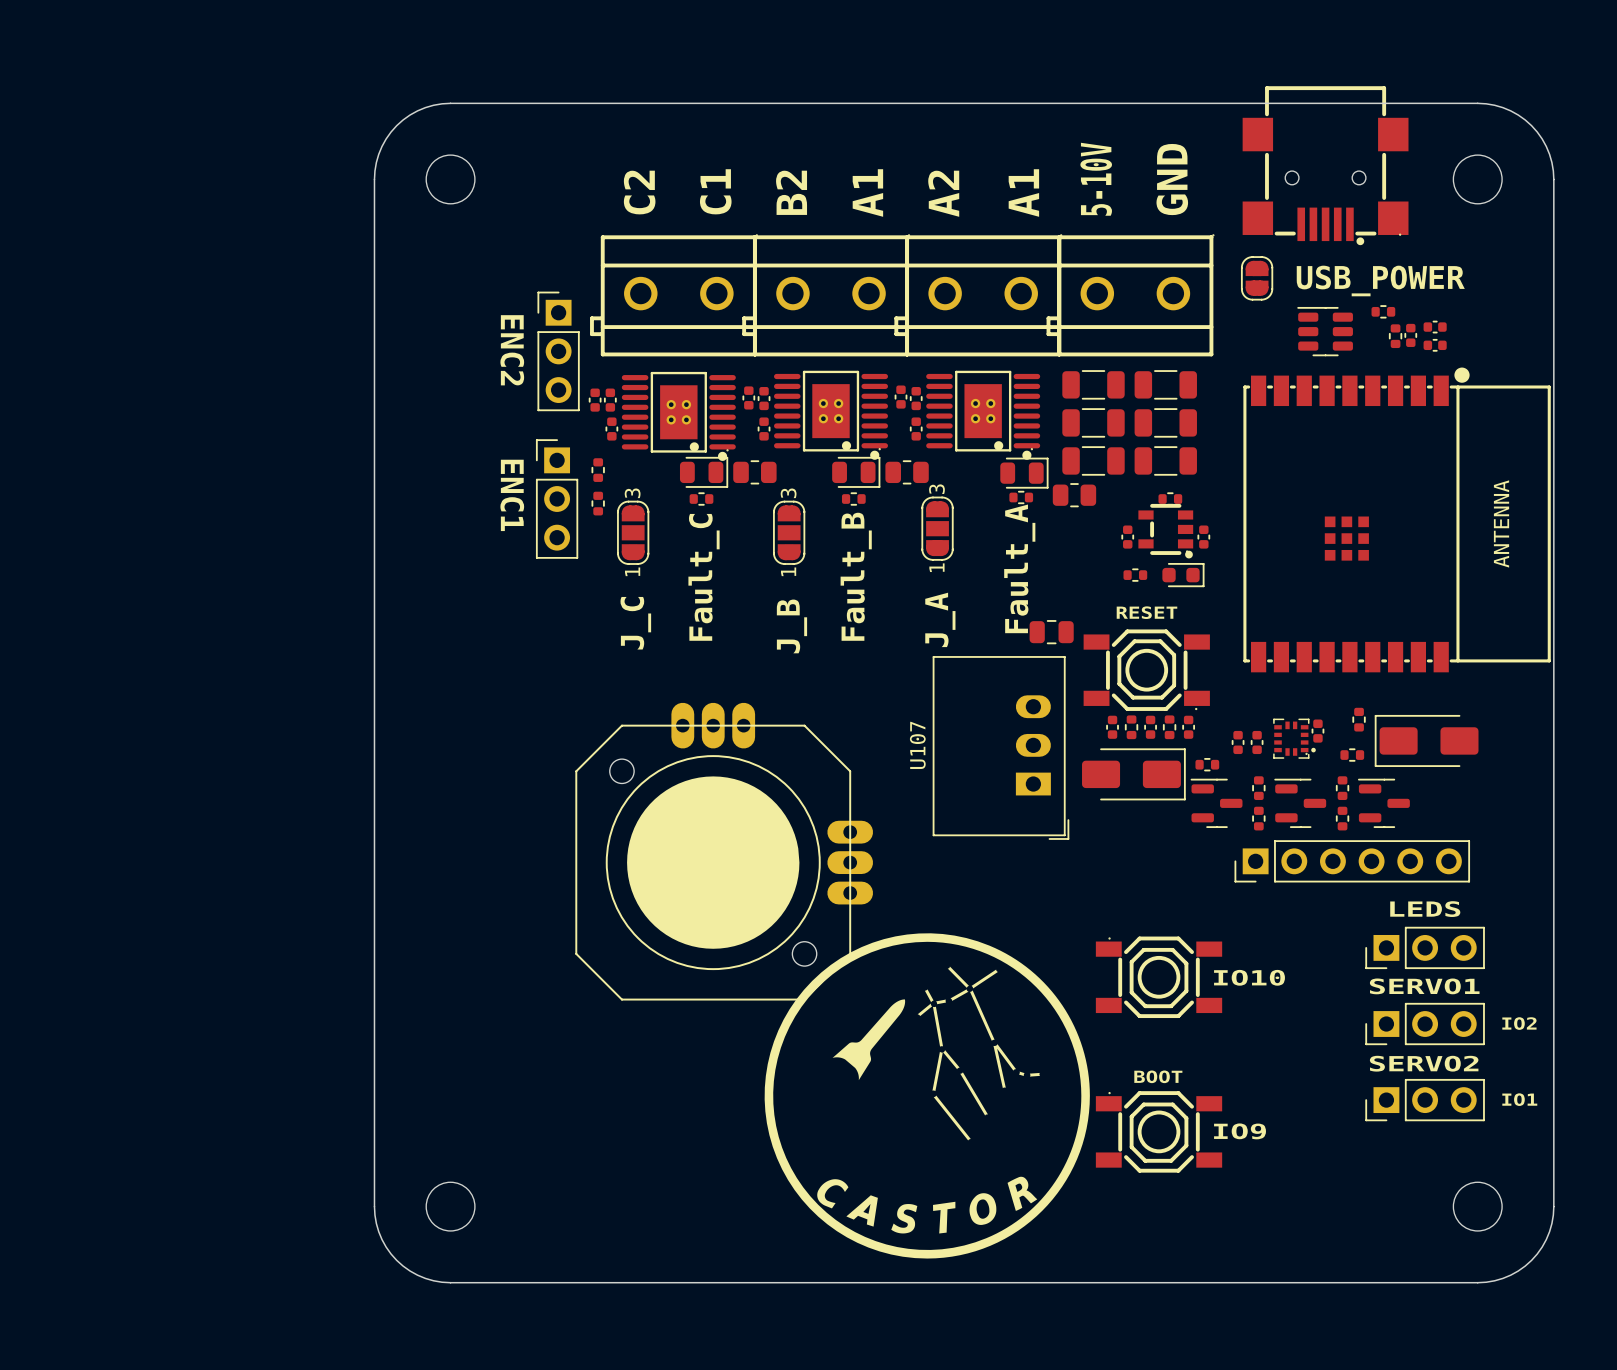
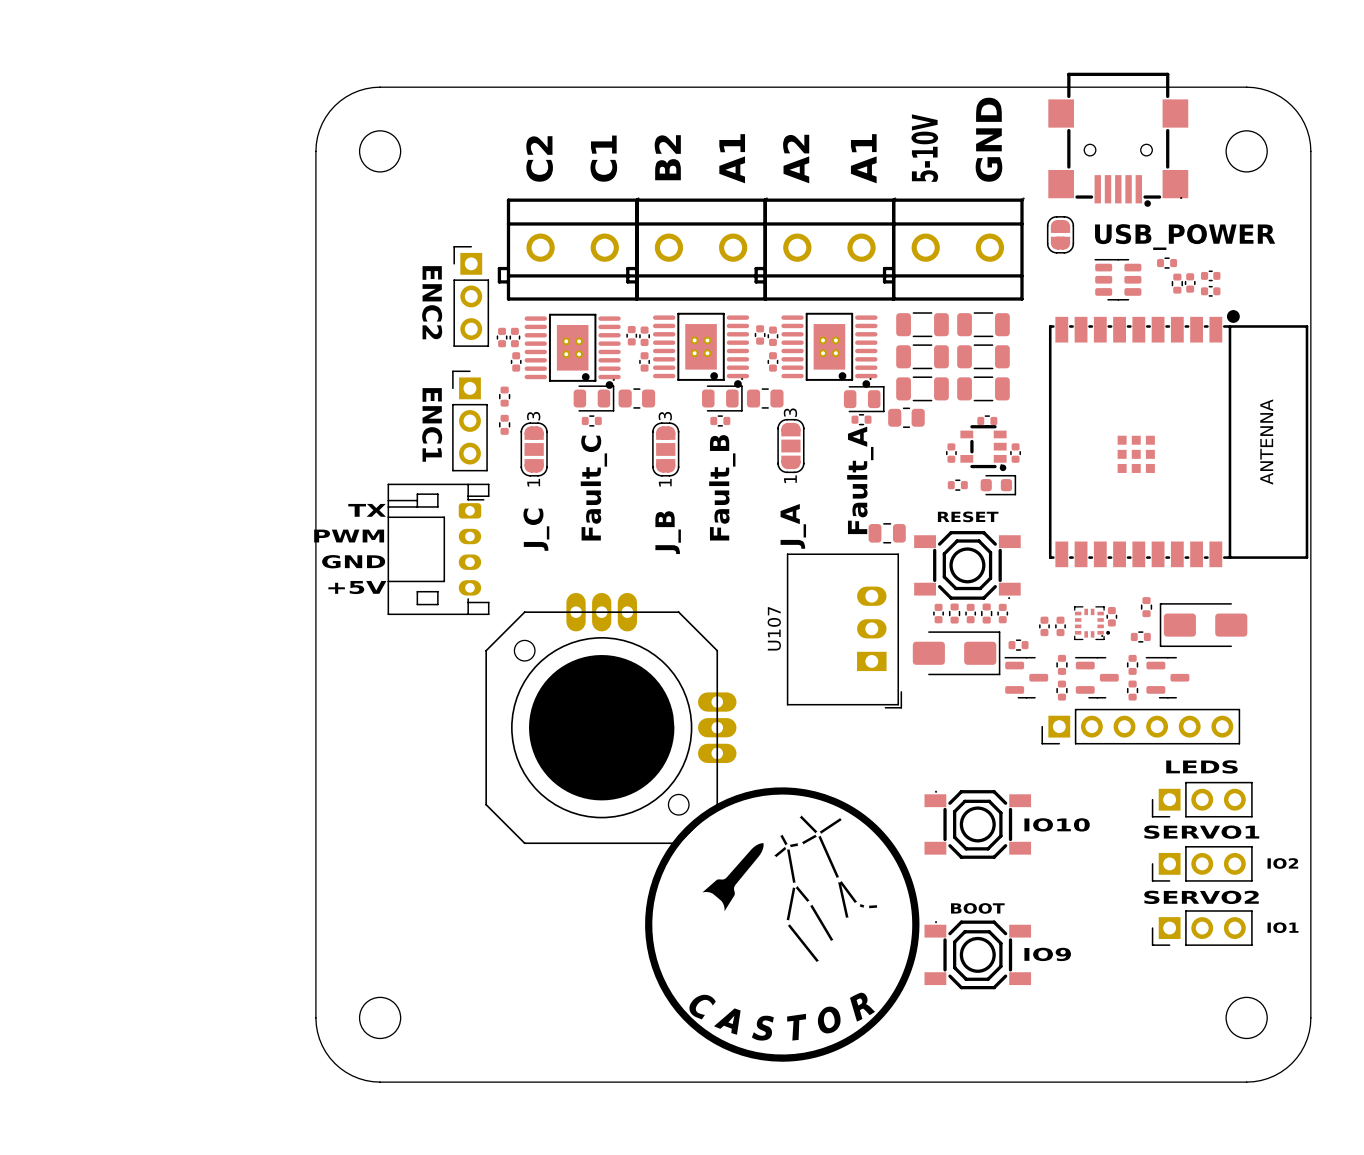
text: none -> TX (367, 510)
text: none -> PWM (349, 536)
part: none -> (438, 549)
text: none -> GND (353, 561)
text: none -> +5V (357, 587)

